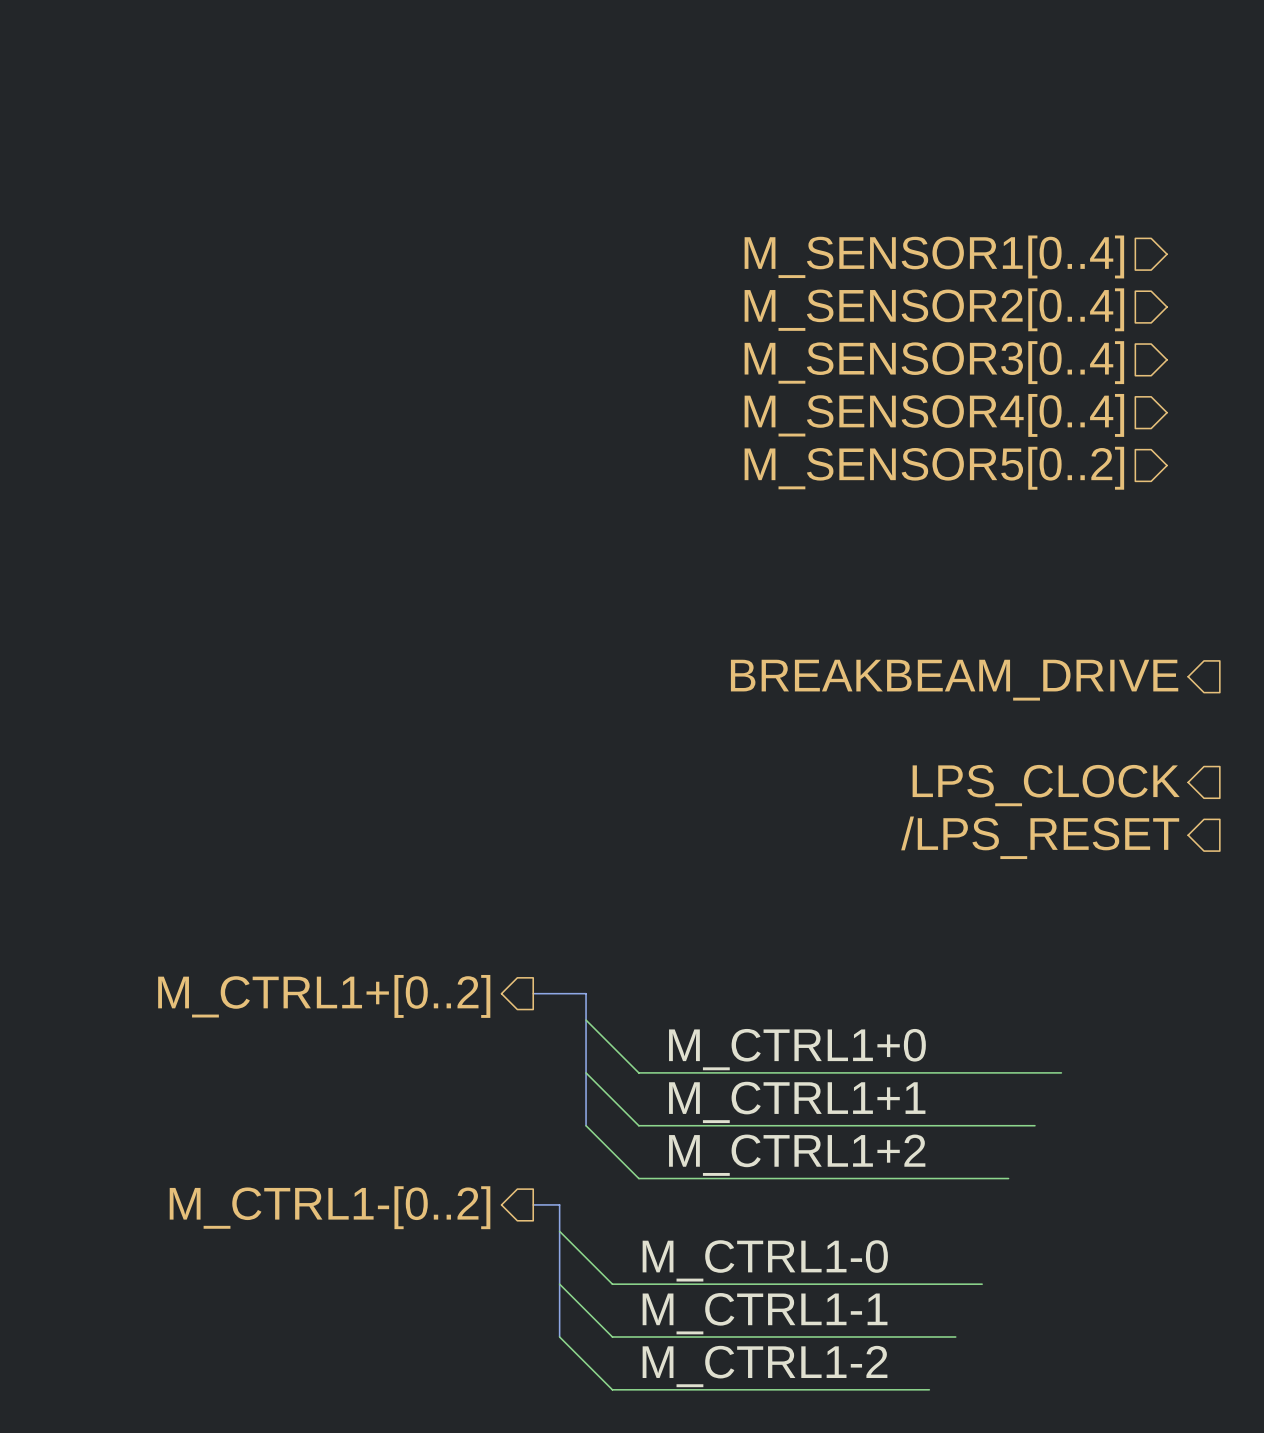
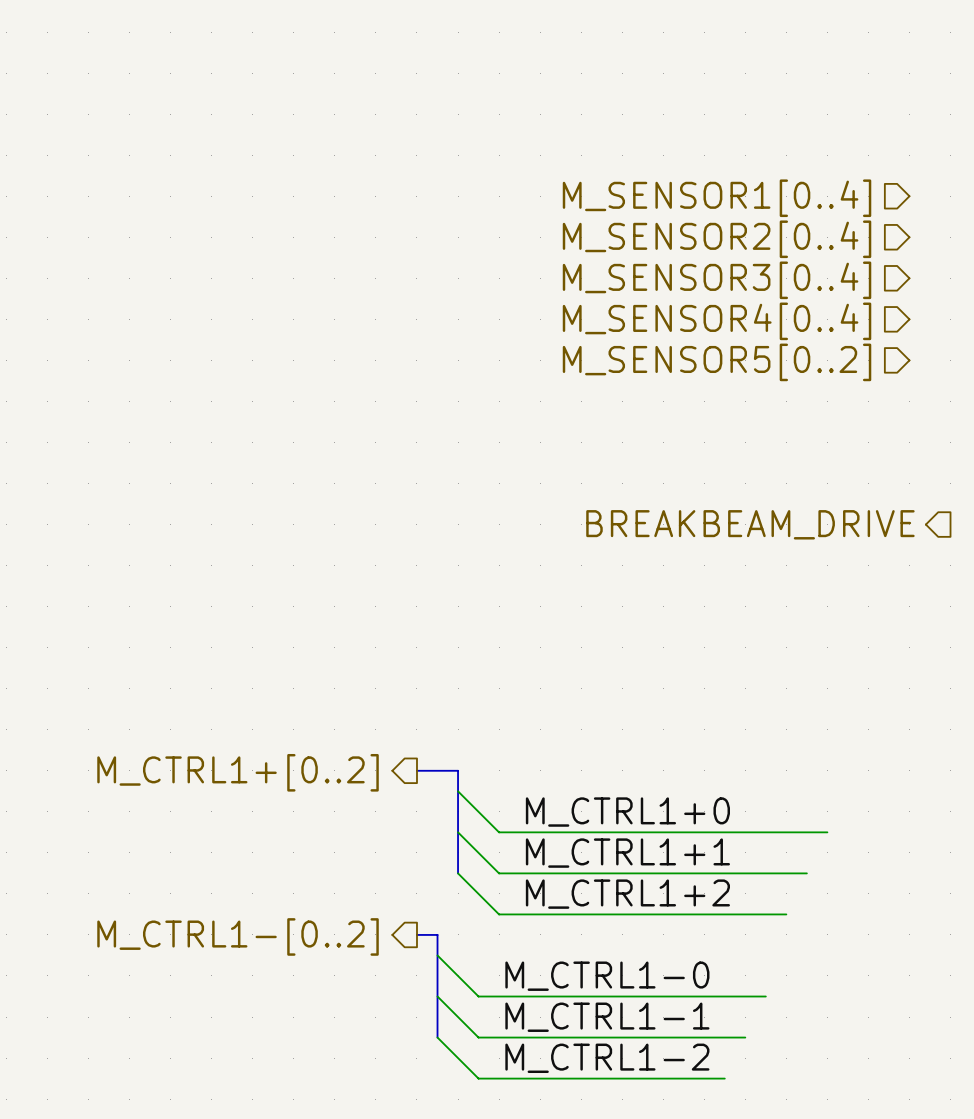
hierarchical label: LPS_CLOCK (1046, 785) -> none
hierarchical label: /LPS_RESET (1040, 837) -> none

